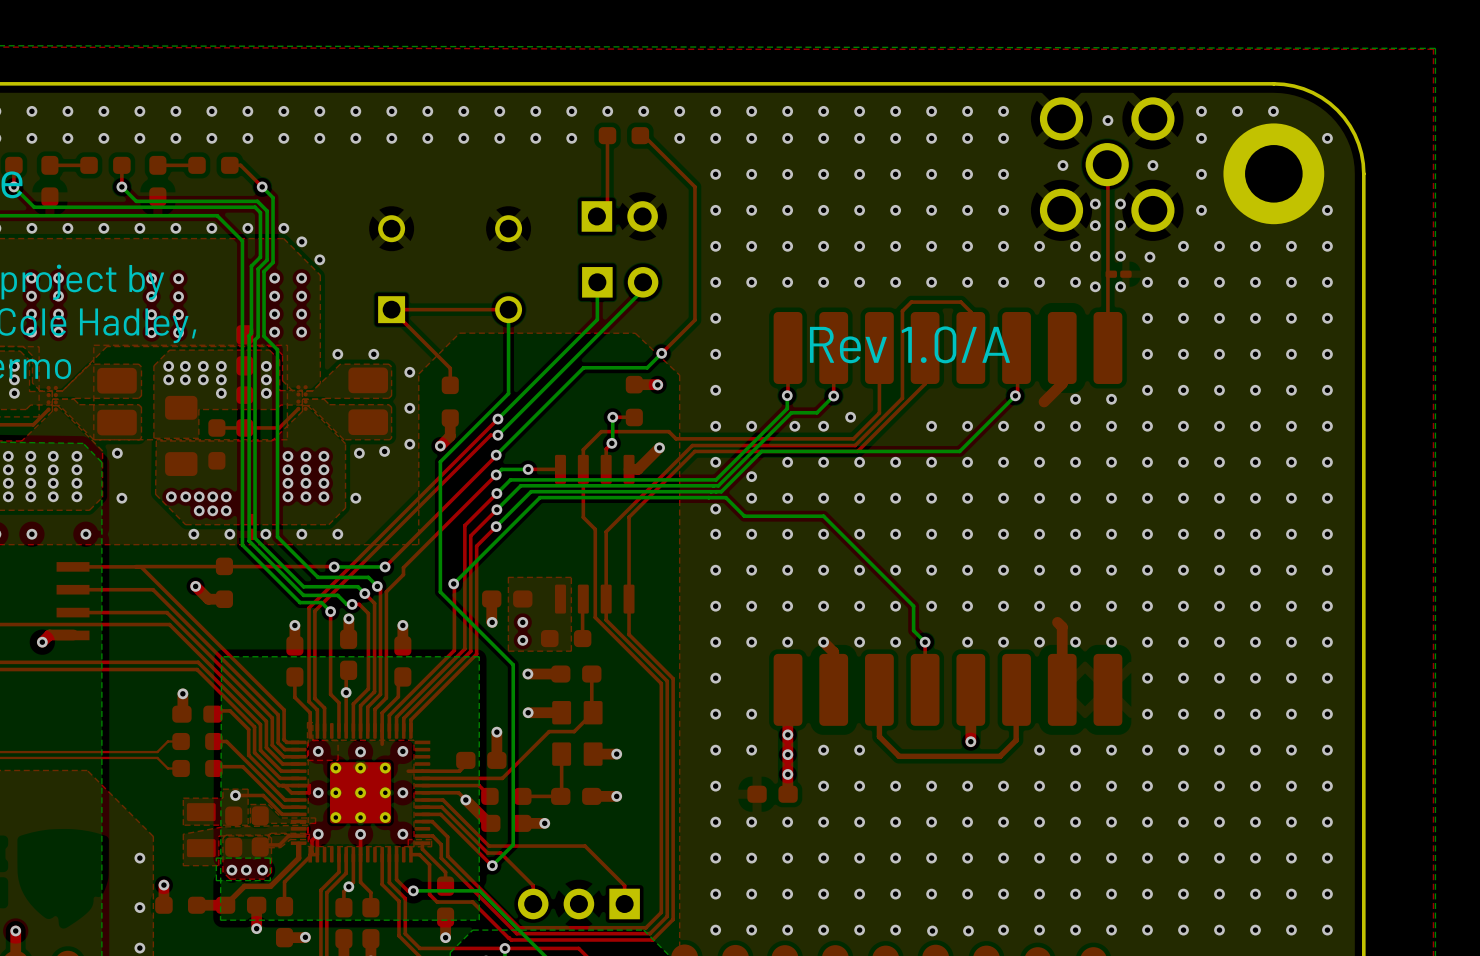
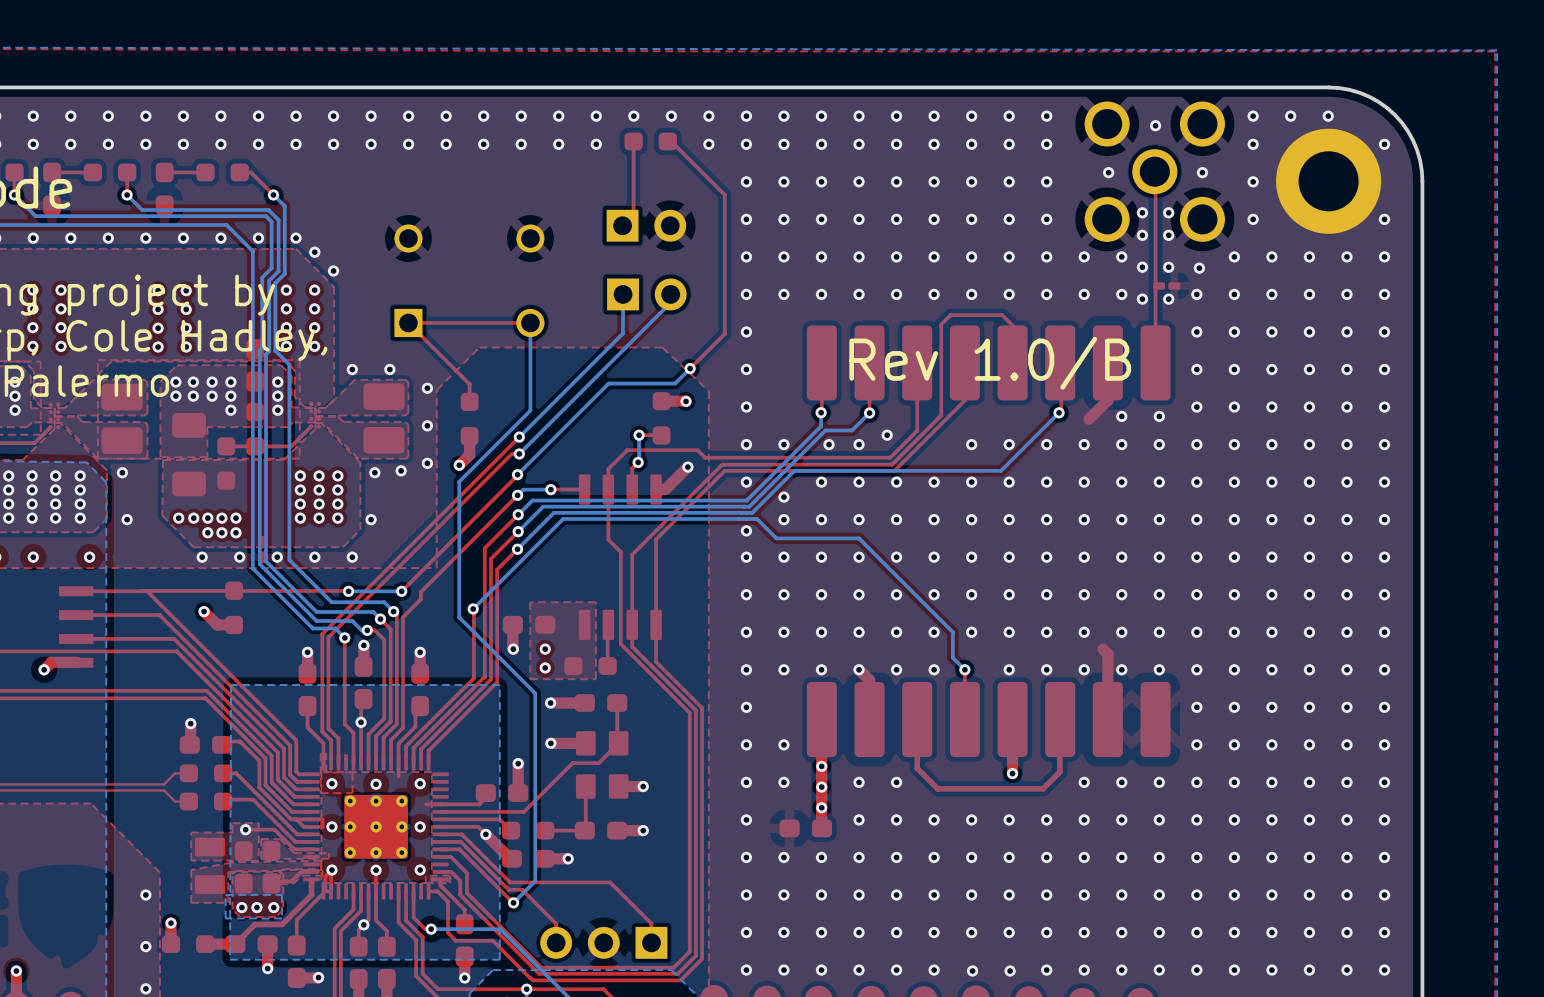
text: Rev 1.0/A (909, 344) -> Rev 1.0/B (990, 363)

